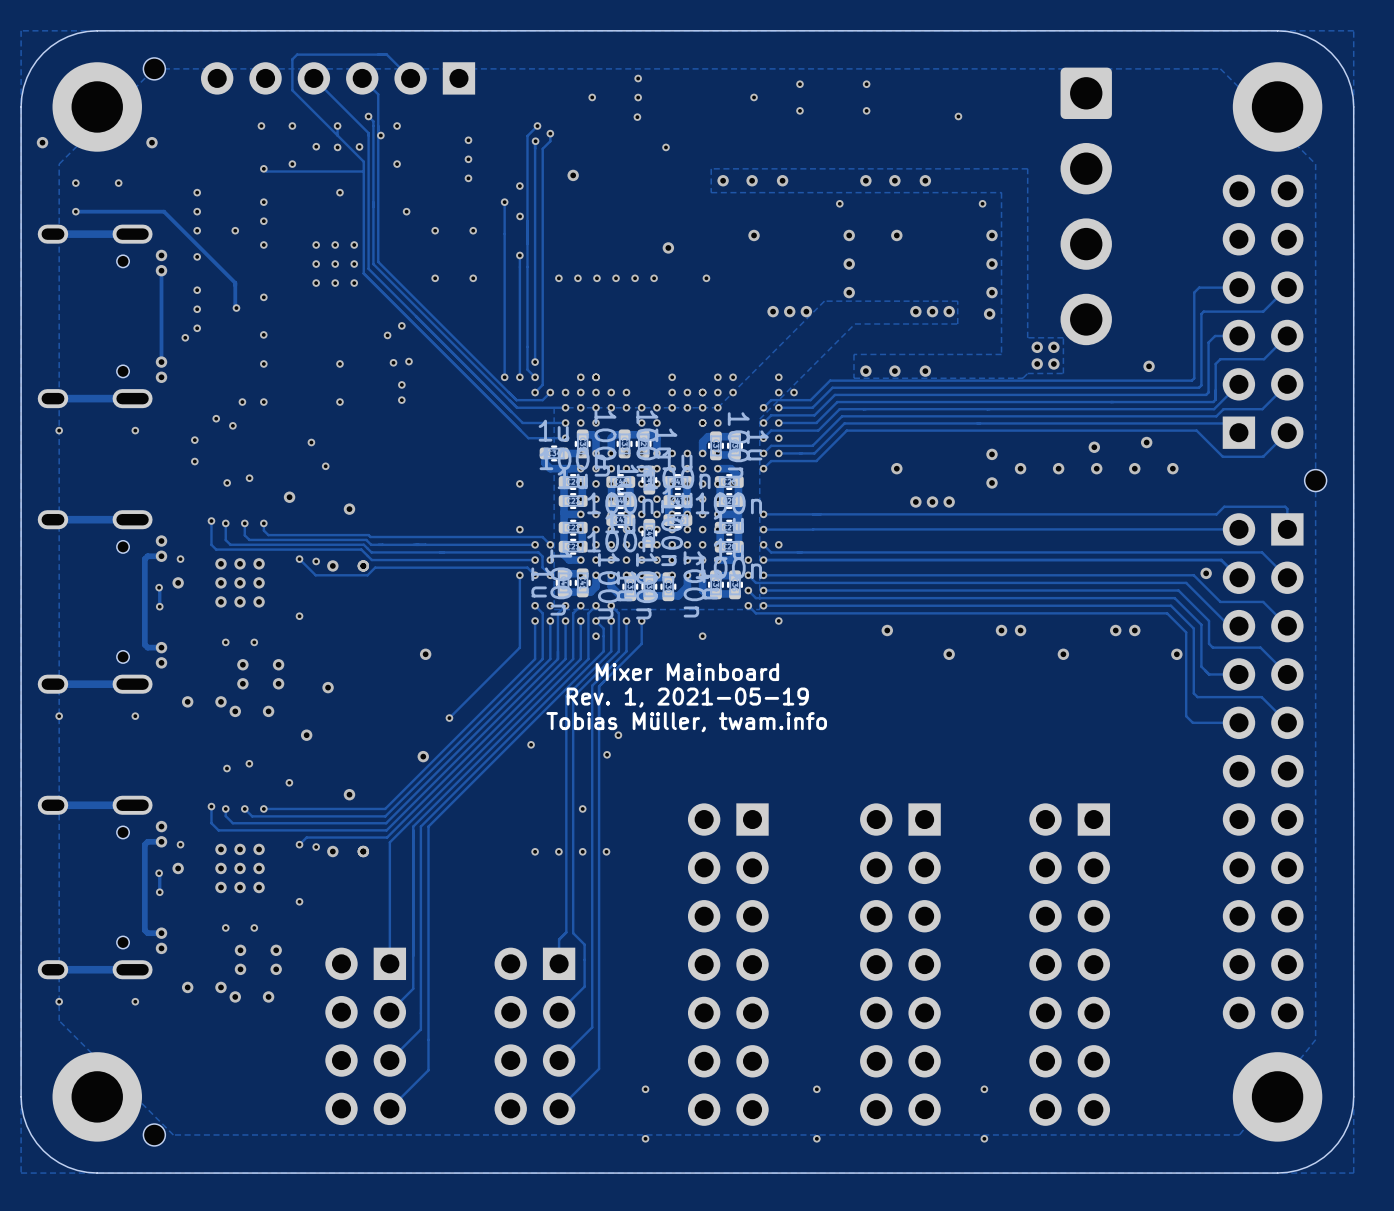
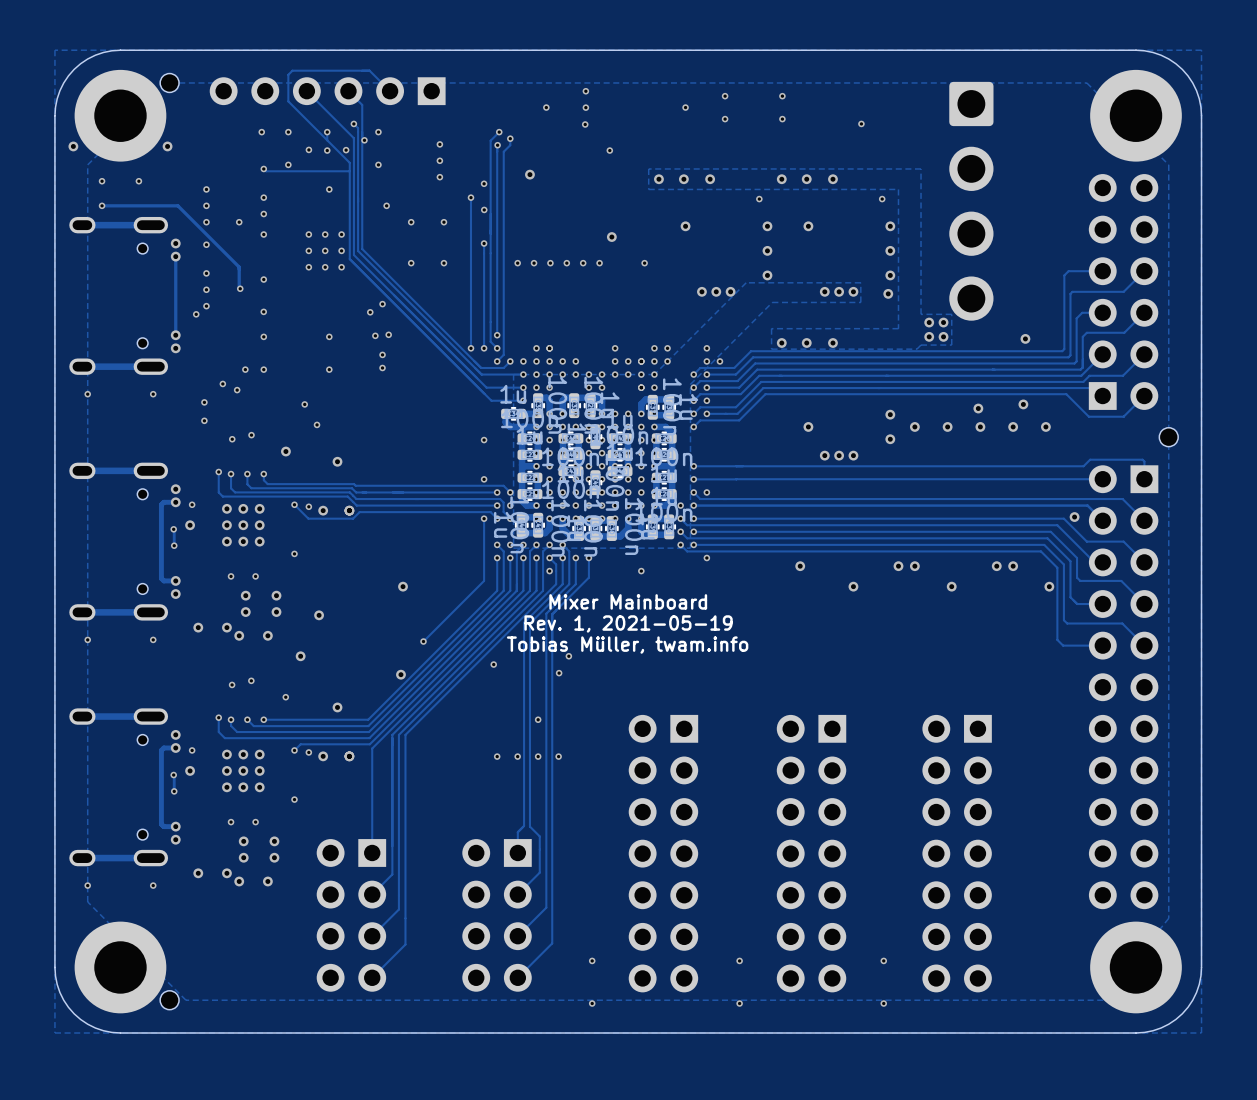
part footprint: [52, 62, 142, 152] -> [74, 69, 167, 162]
part footprint: [1232, 62, 1323, 152] -> [1090, 69, 1182, 162]
part footprint: [52, 1052, 142, 1142] -> [74, 921, 167, 1014]
part footprint: [1232, 1052, 1323, 1142] -> [1090, 921, 1182, 1014]

